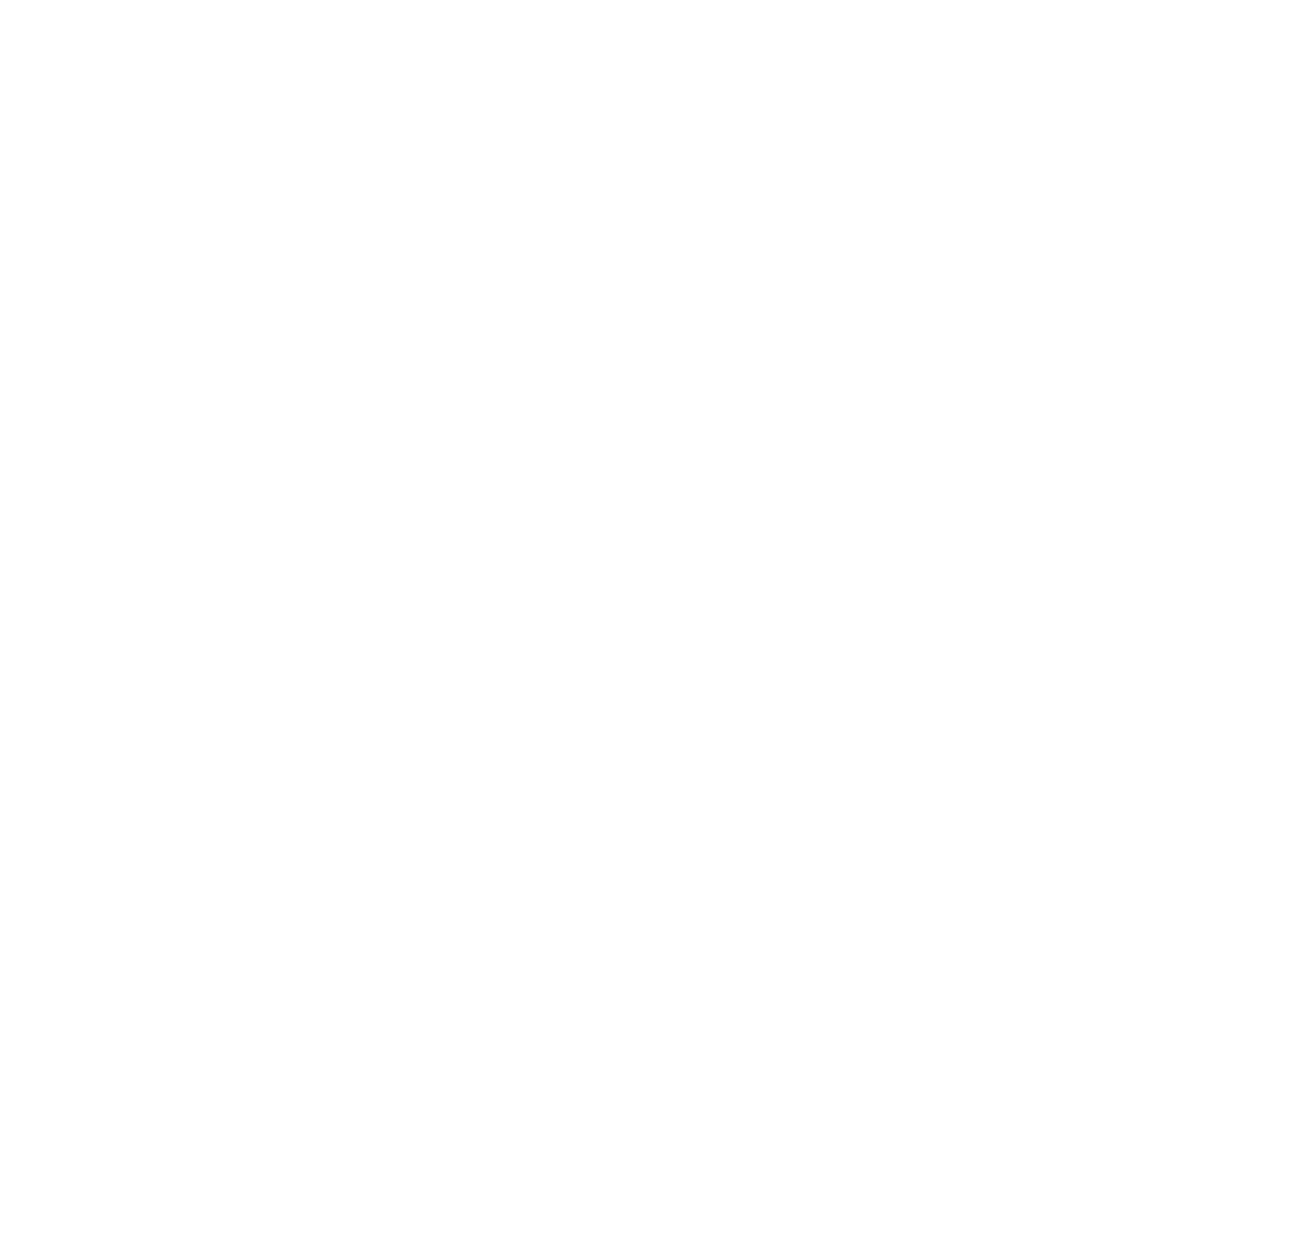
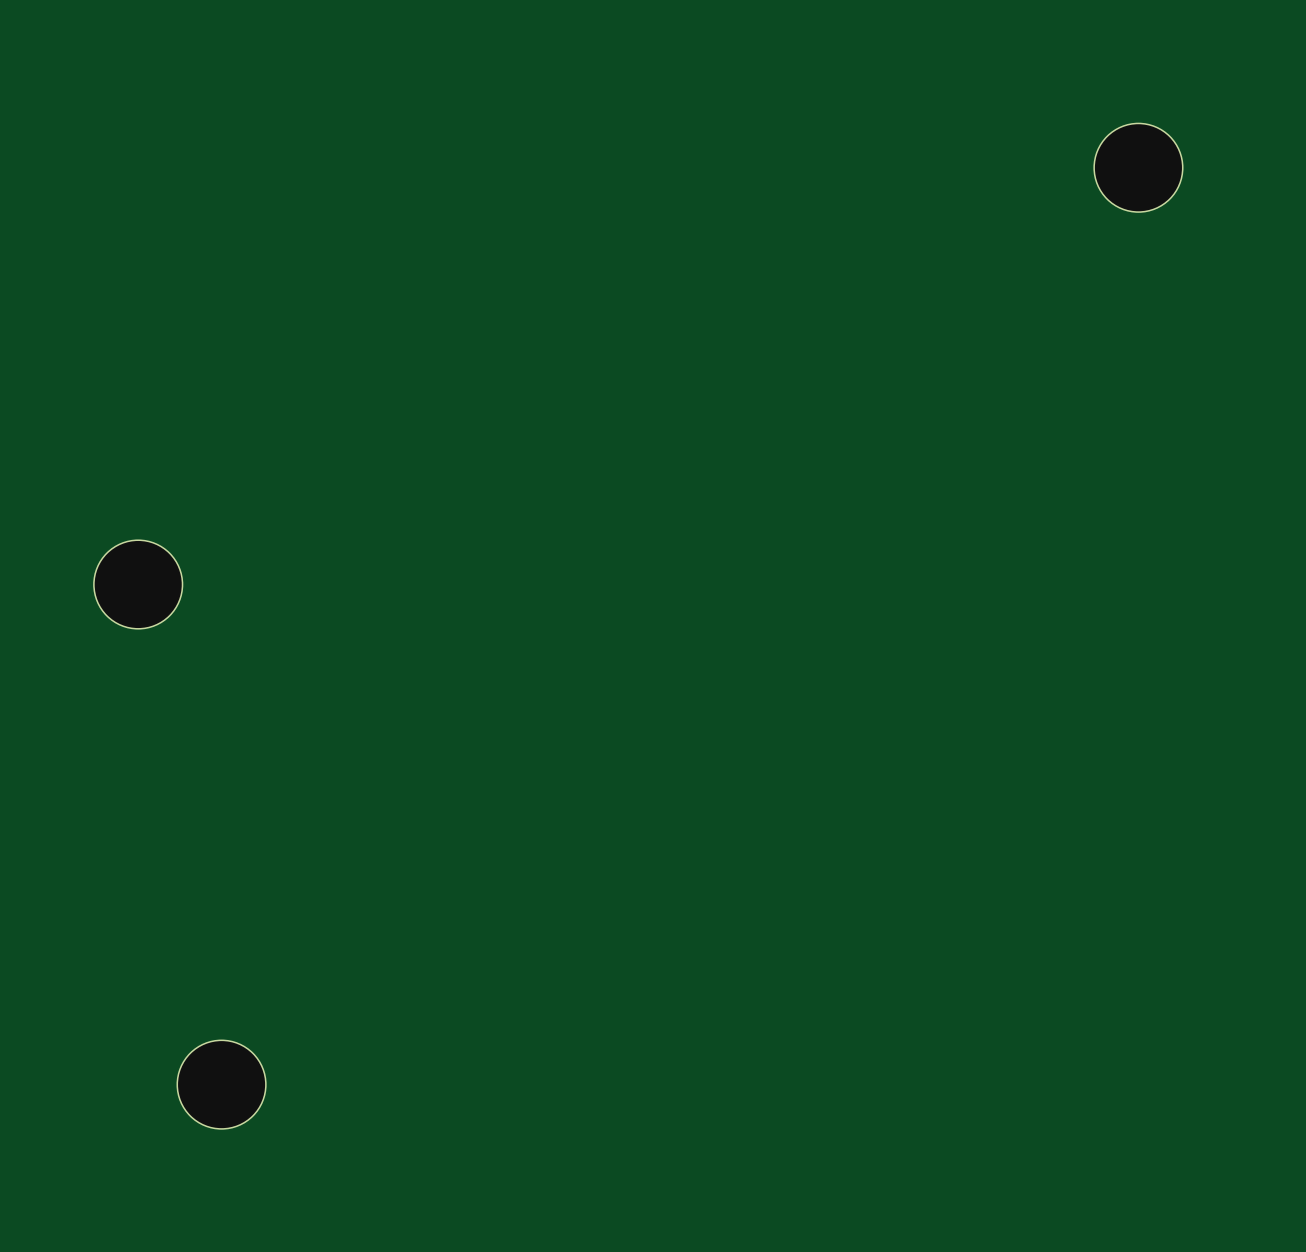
part: none -> (1138, 167)
part: none -> (138, 584)
part: none -> (221, 1084)

